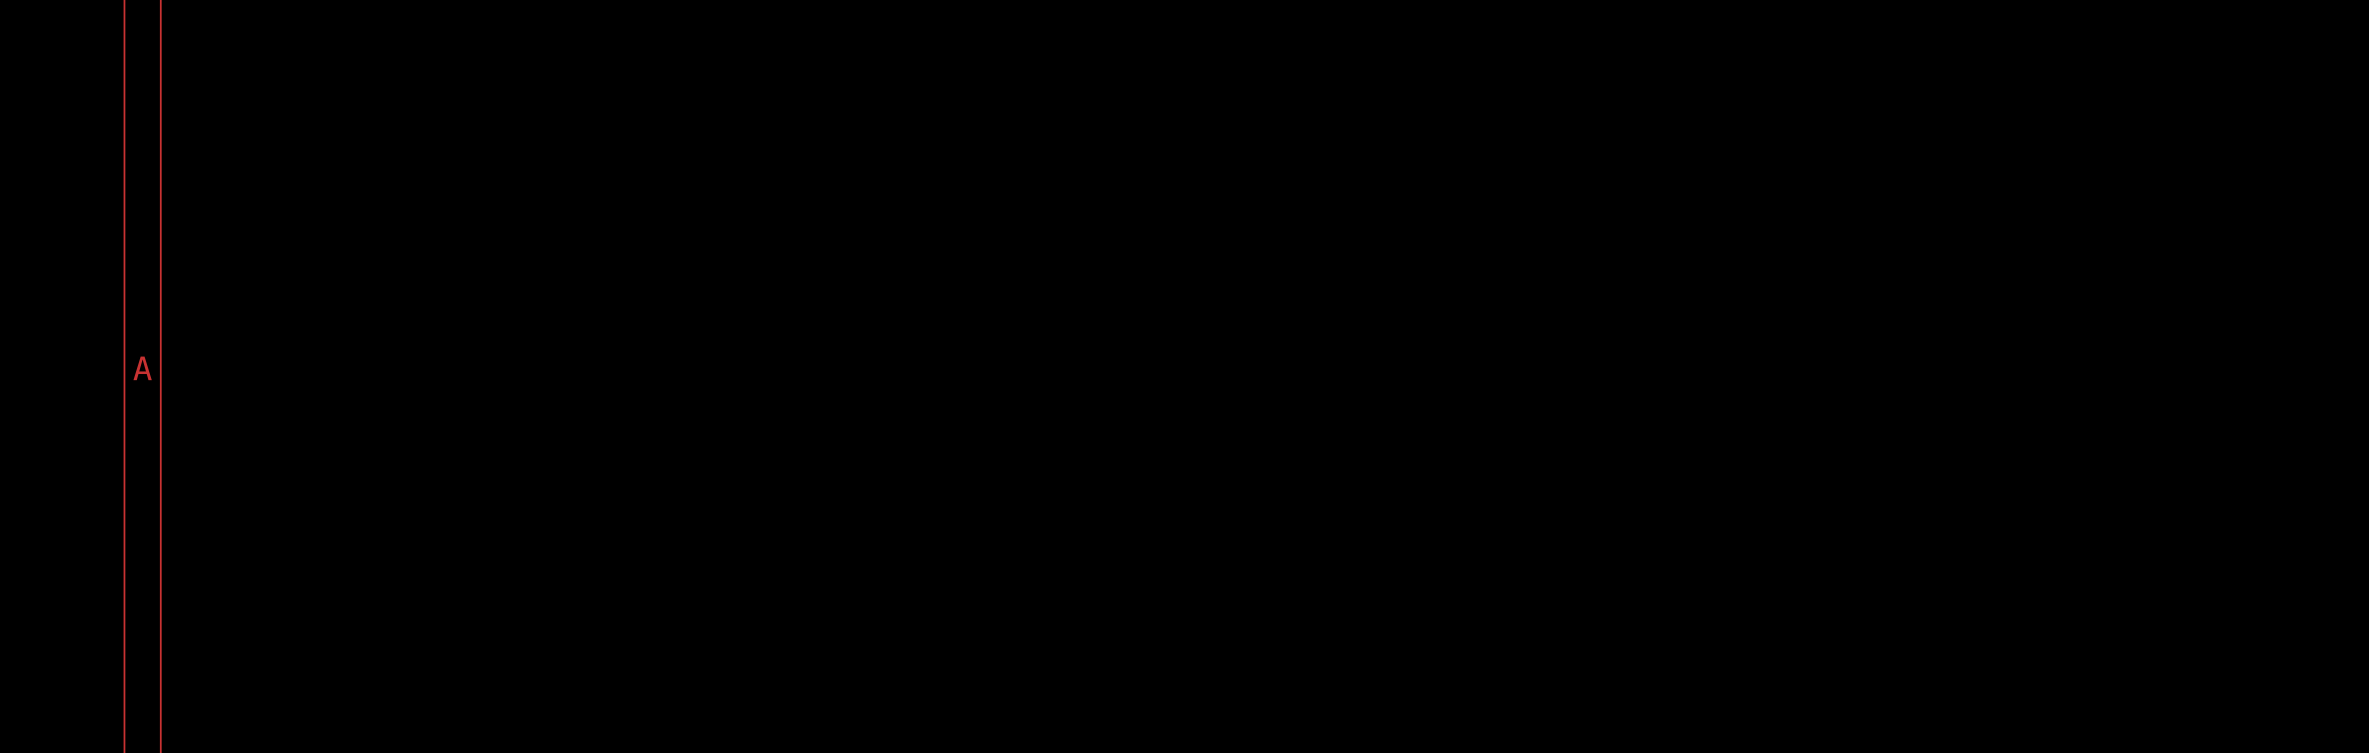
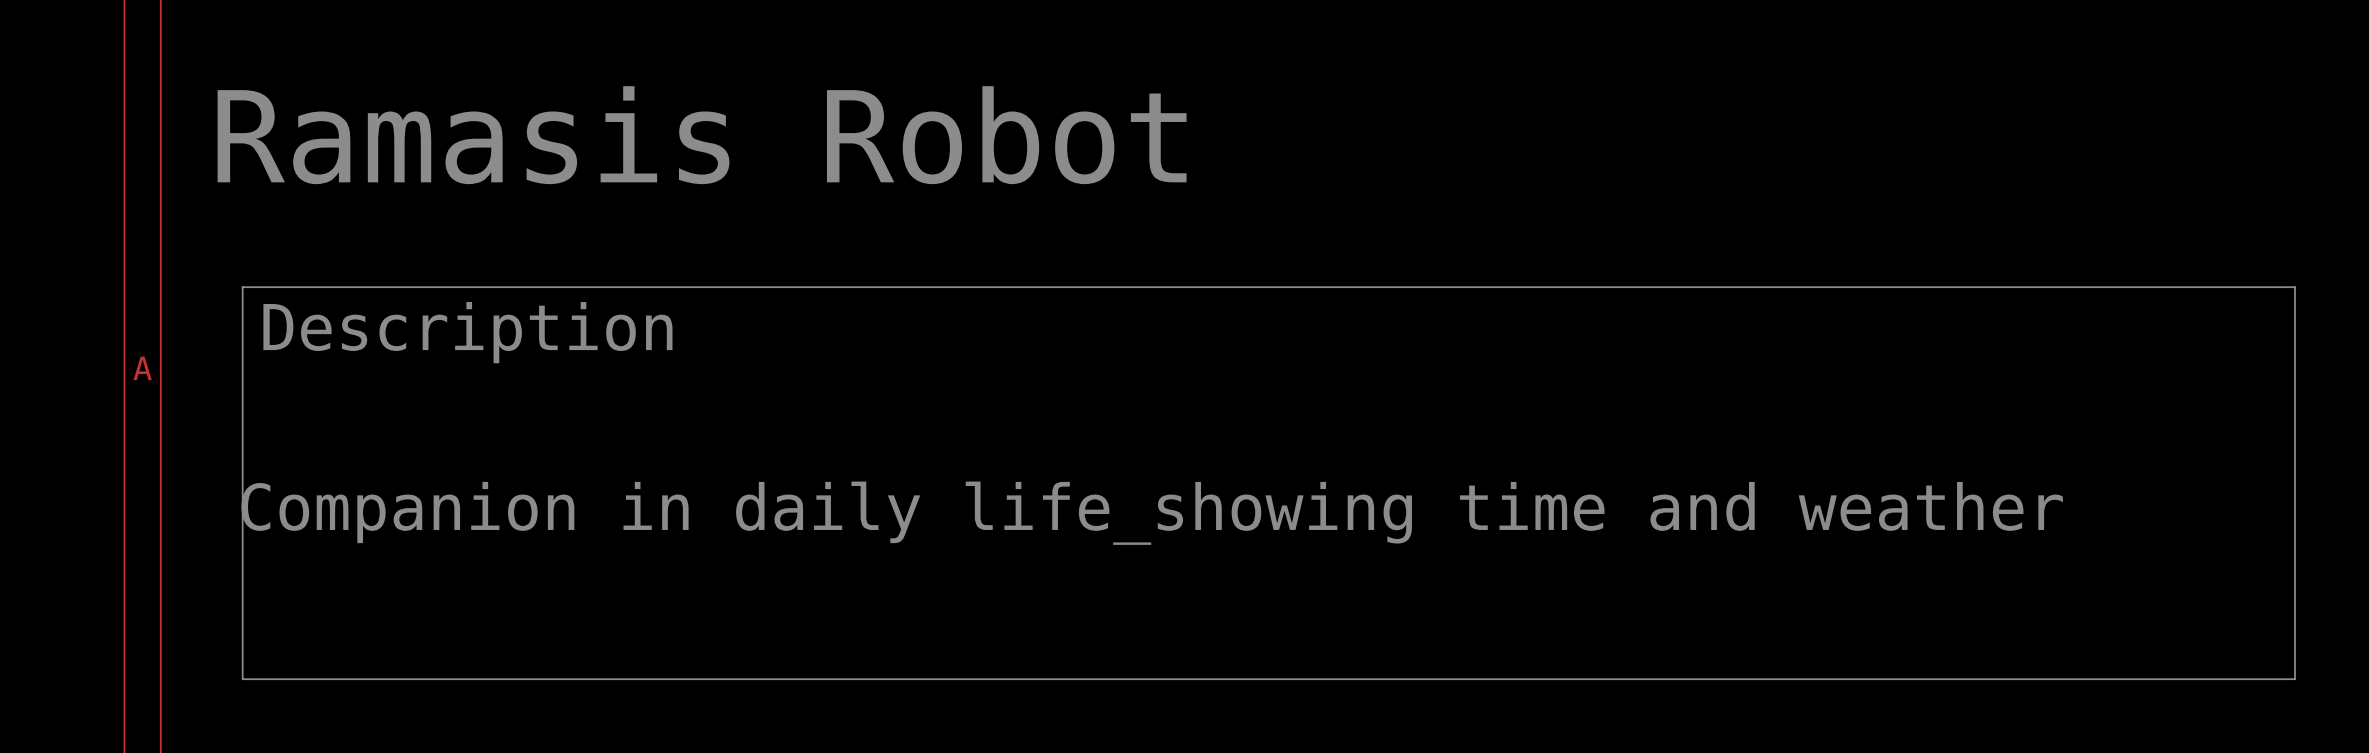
text: none -> Ramasis Robot (702, 135)
line: none -> (242, 287) (2295, 287) (2295, 679) (242, 679) (242, 287)
text: none -> Description (467, 332)
text: none -> Companion in daily life_showing time and weather (1152, 513)

